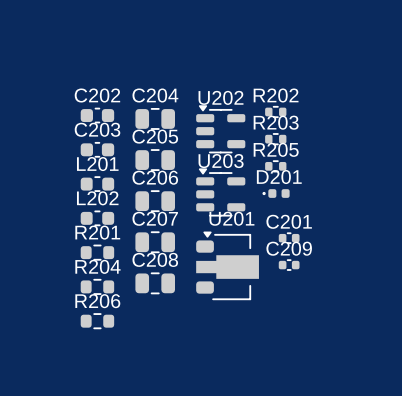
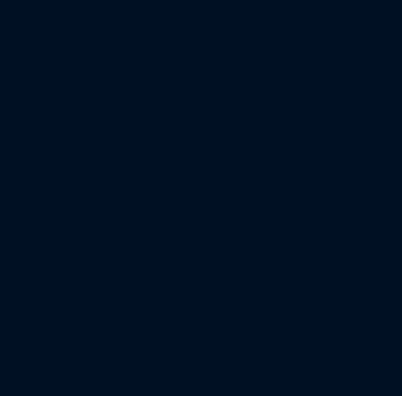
R202: (275, 111) -> none
C202: (97, 115) -> none
C204: (155, 118) -> none
U202: (220, 129) -> none
R203: (275, 139) -> none
C203: (97, 149) -> none
C205: (155, 160) -> none
R205: (275, 166) -> none
L201: (97, 184) -> none
U203: (220, 192) -> none
D201: (276, 193) -> none
C206: (155, 201) -> none
L202: (97, 218) -> none
C201: (289, 238) -> none
C207: (155, 242) -> none
R201: (97, 252) -> none
U201: (227, 265) -> none
C209: (289, 265) -> none
C208: (155, 283) -> none
R204: (97, 286) -> none
R206: (97, 321) -> none

